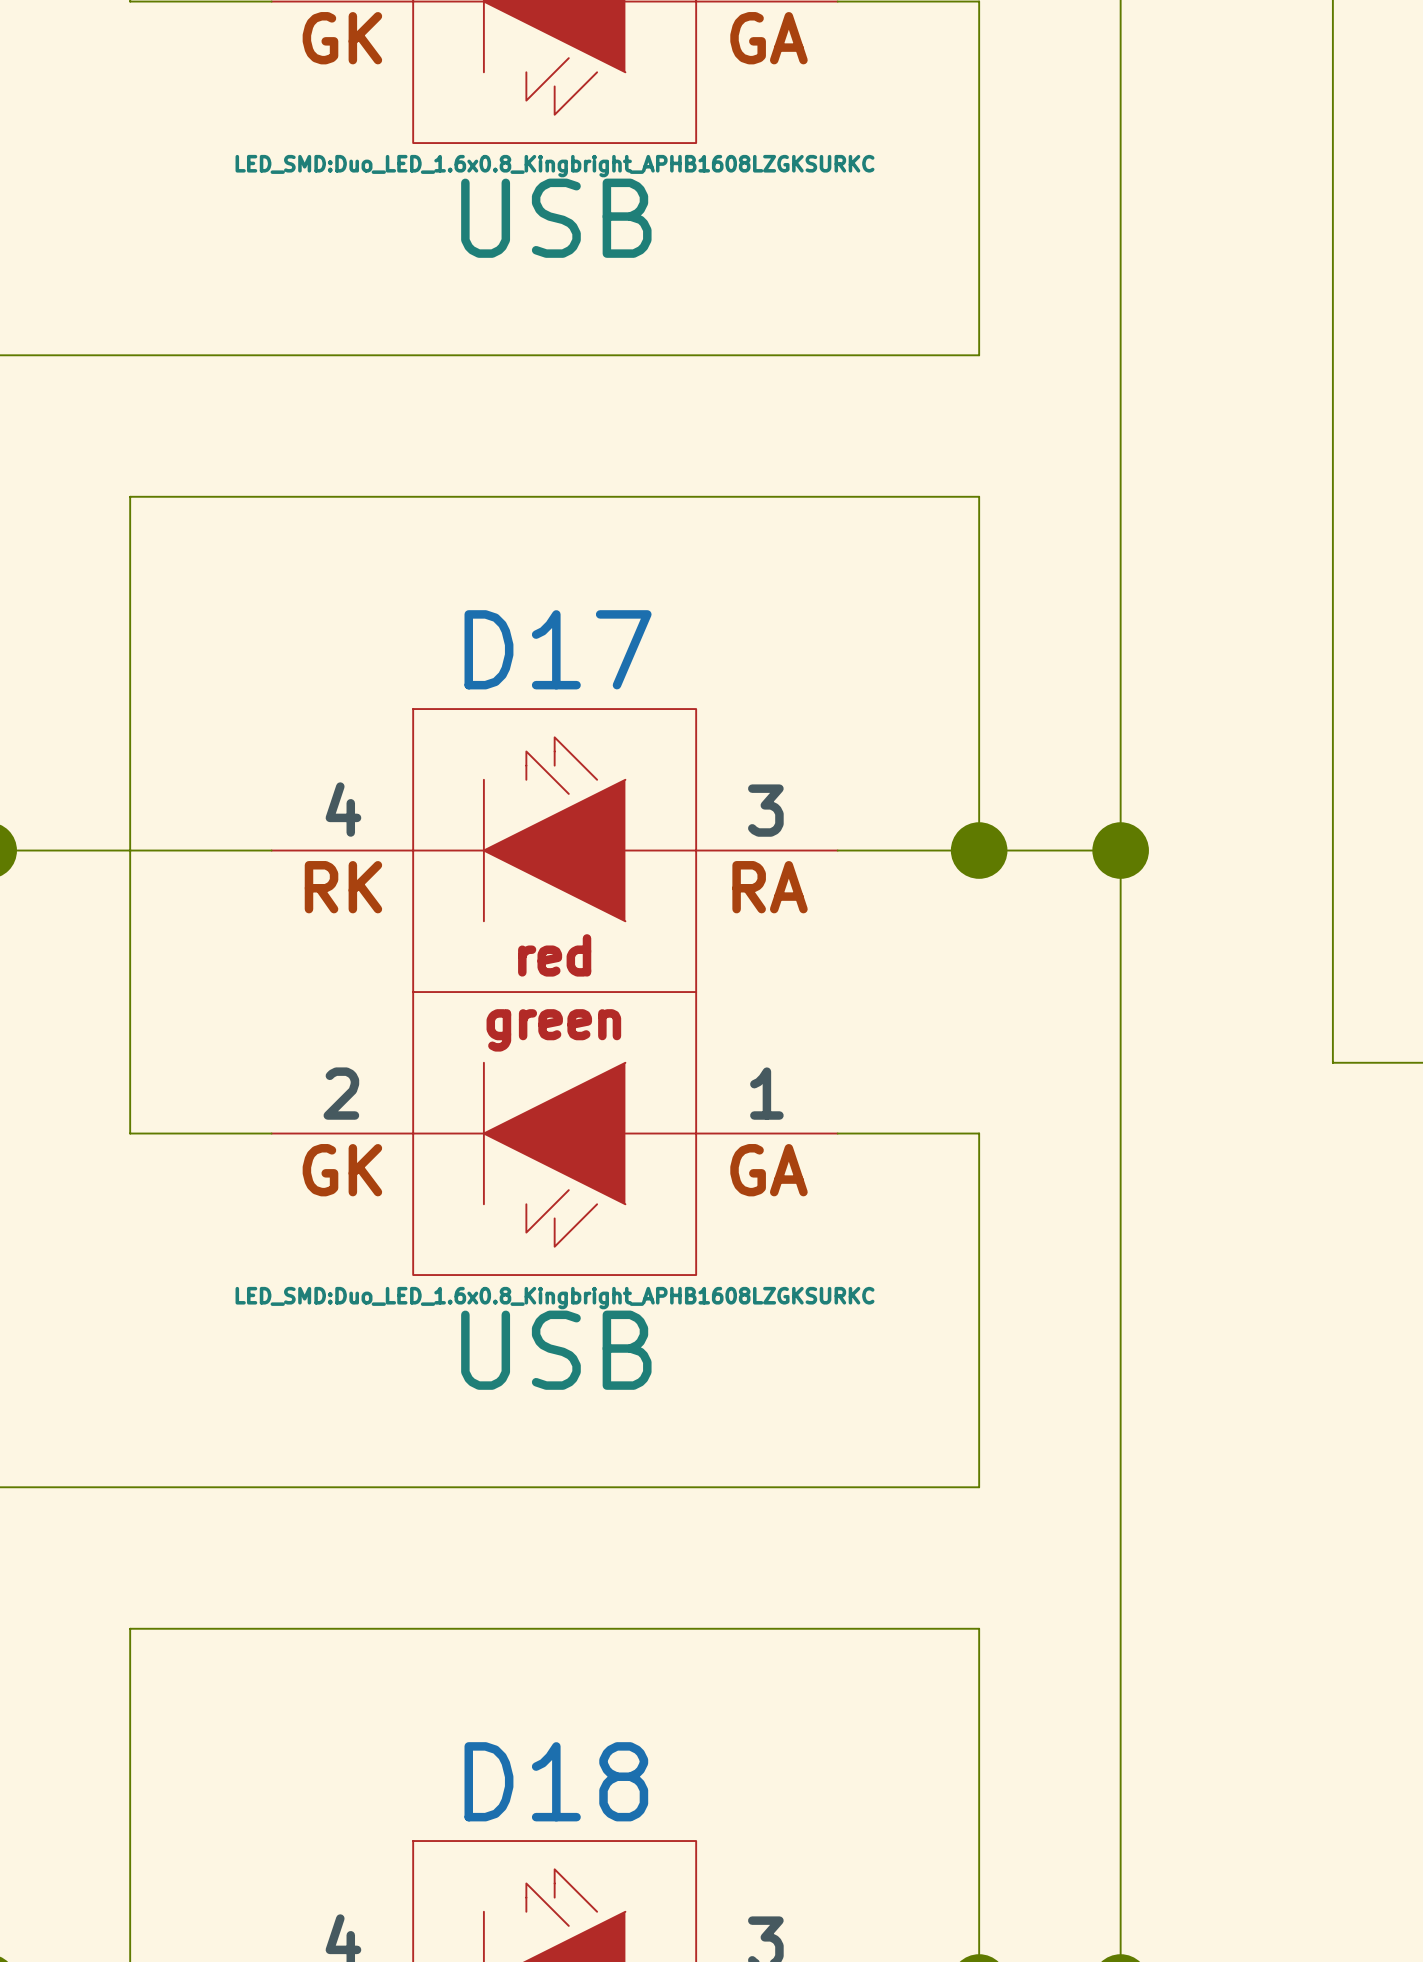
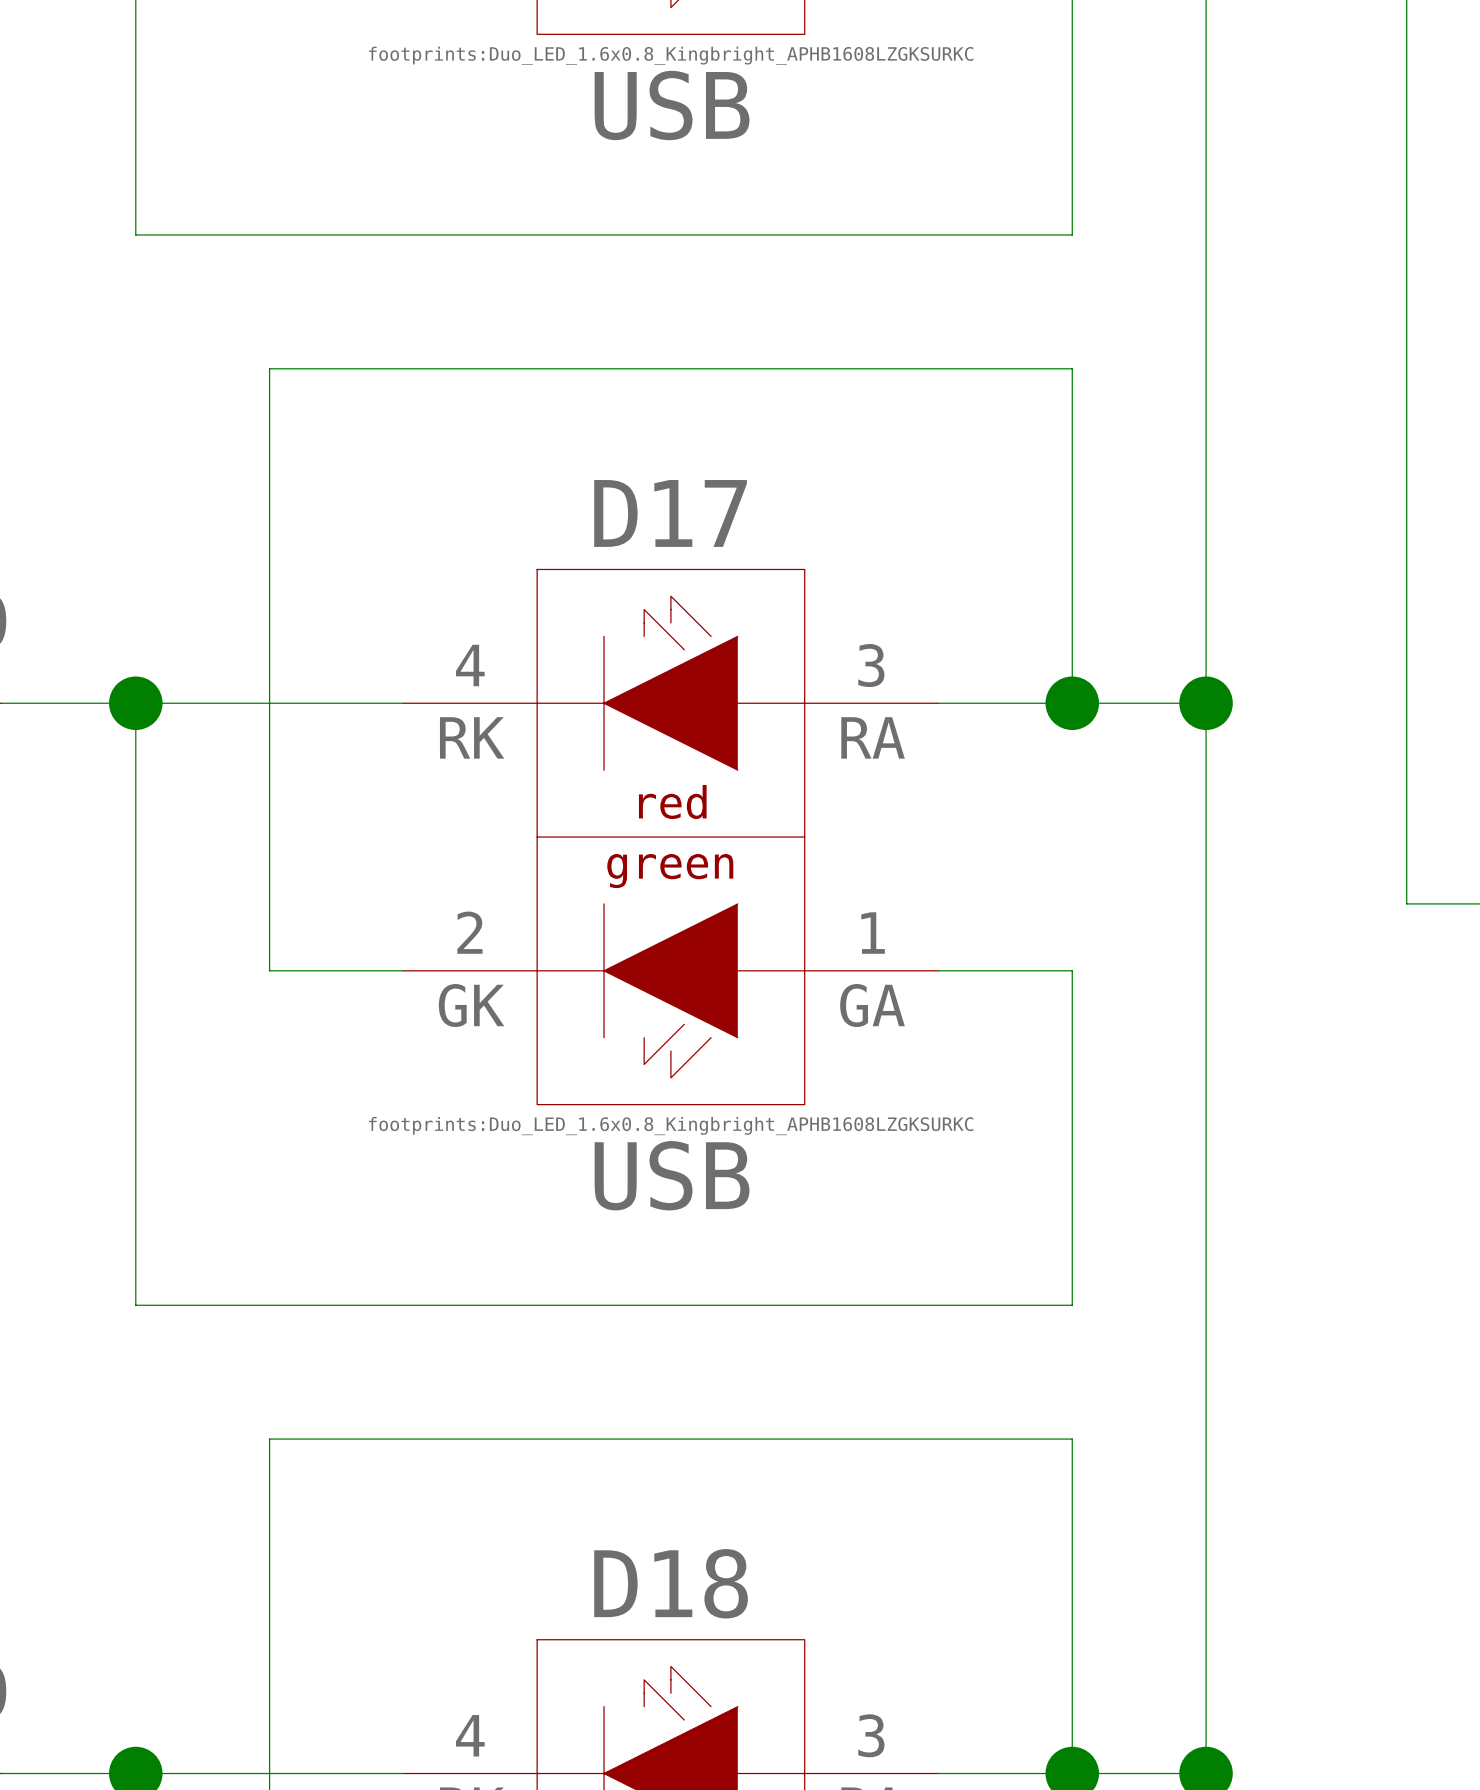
part text: LED_SMD:Duo_LED_1.6x0.8_Kingbright_APHB1608LZGKSURKC (554, 166) -> footprints:Duo_LED_1.6x0.8_Kingbright_APHB1608LZGKSURKC (671, 55)
D17 text: LED_SMD:Duo_LED_1.6x0.8_Kingbright_APHB1608LZGKSURKC (554, 1298) -> footprints:Duo_LED_1.6x0.8_Kingbright_APHB1608LZGKSURKC (671, 1126)

